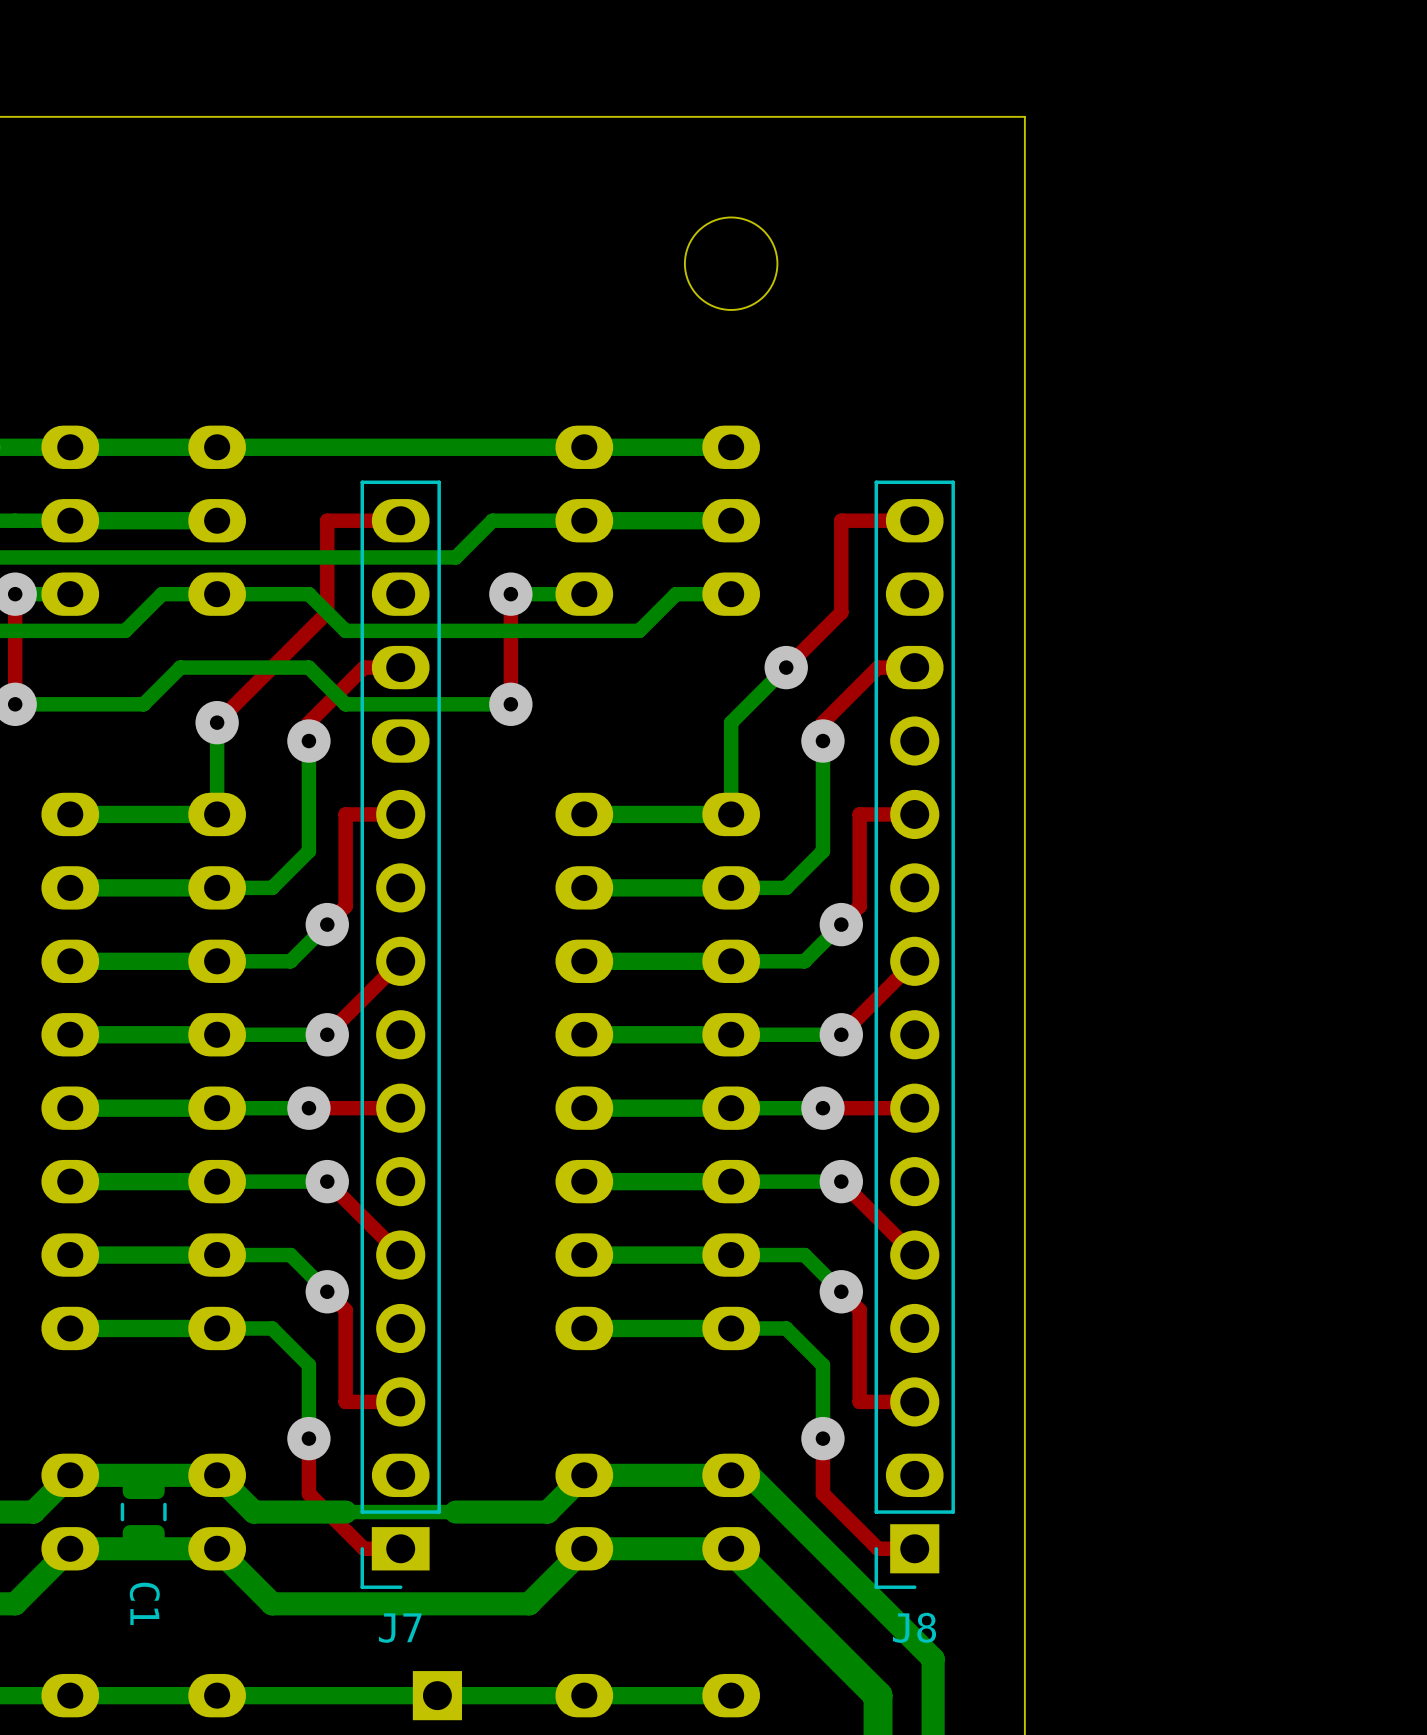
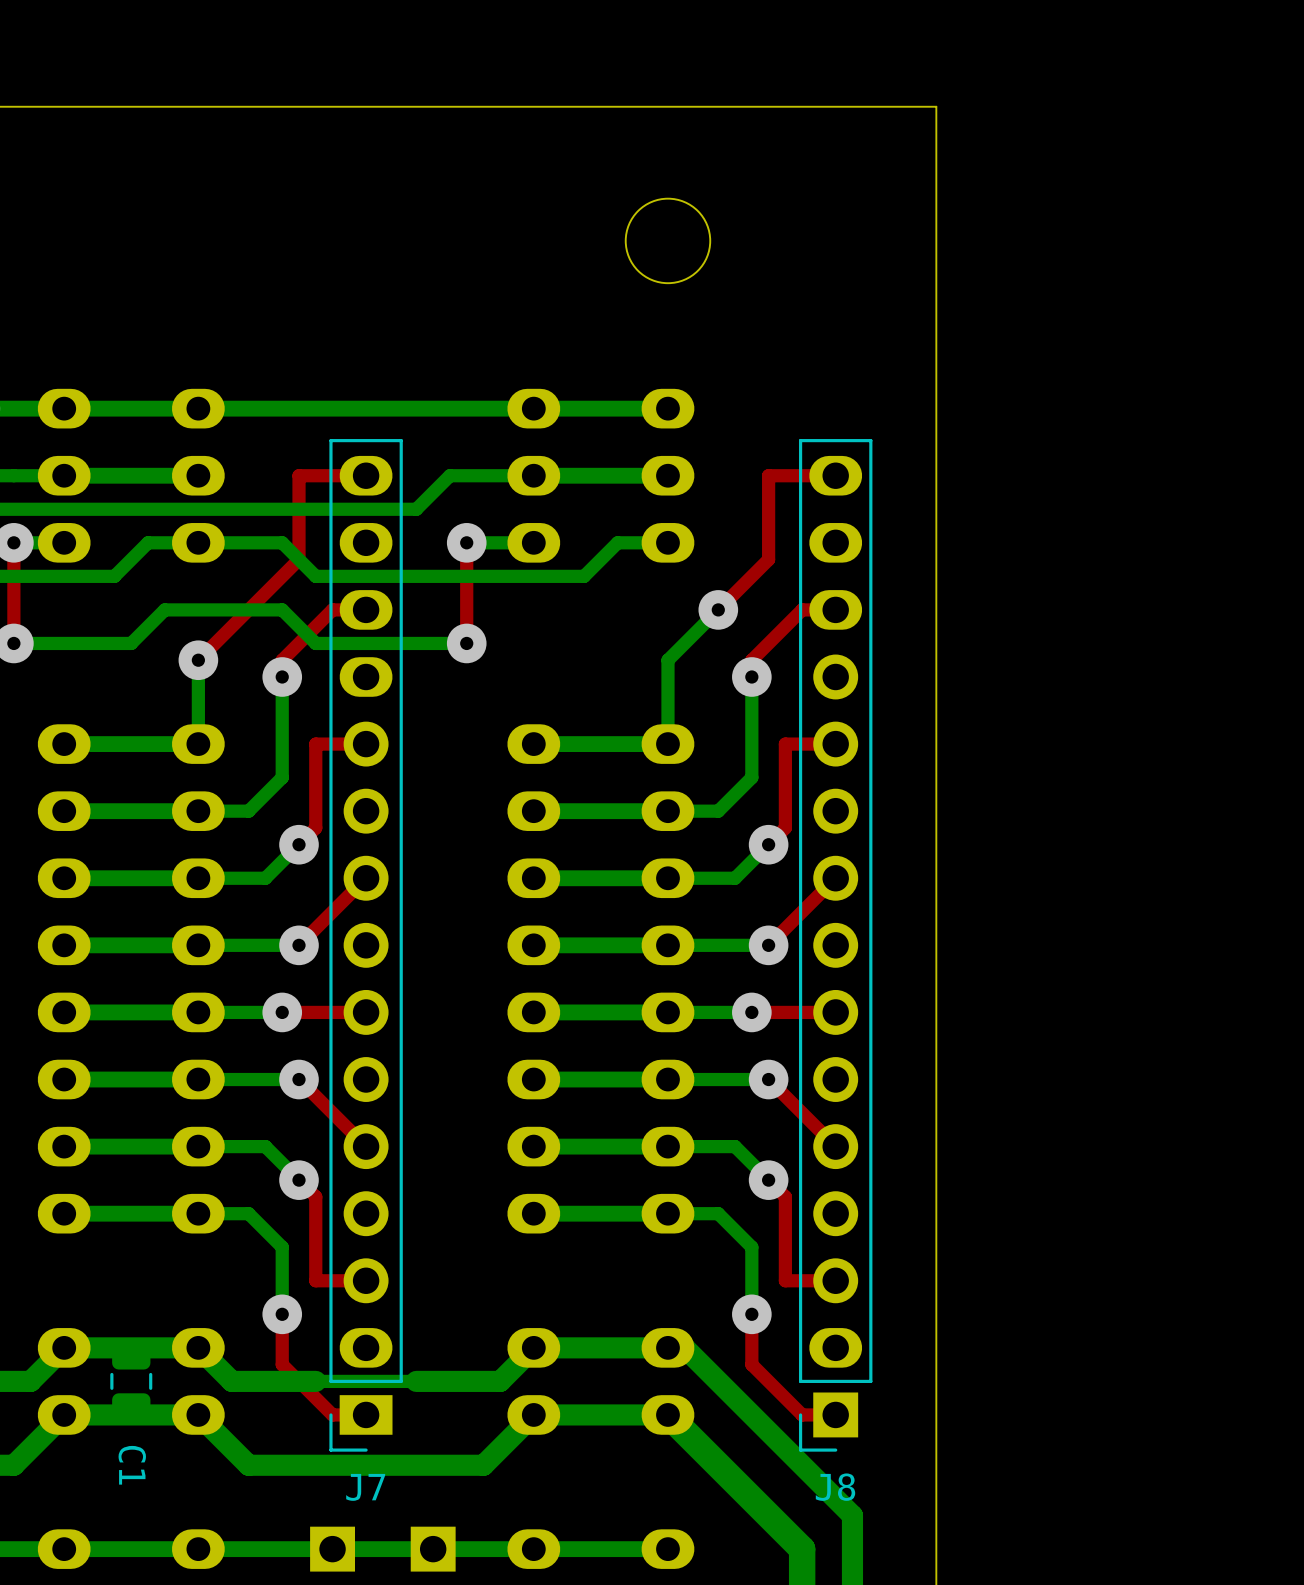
part: none -> (332, 1549)
part: (437, 1695) -> none
part: none -> (433, 1549)

